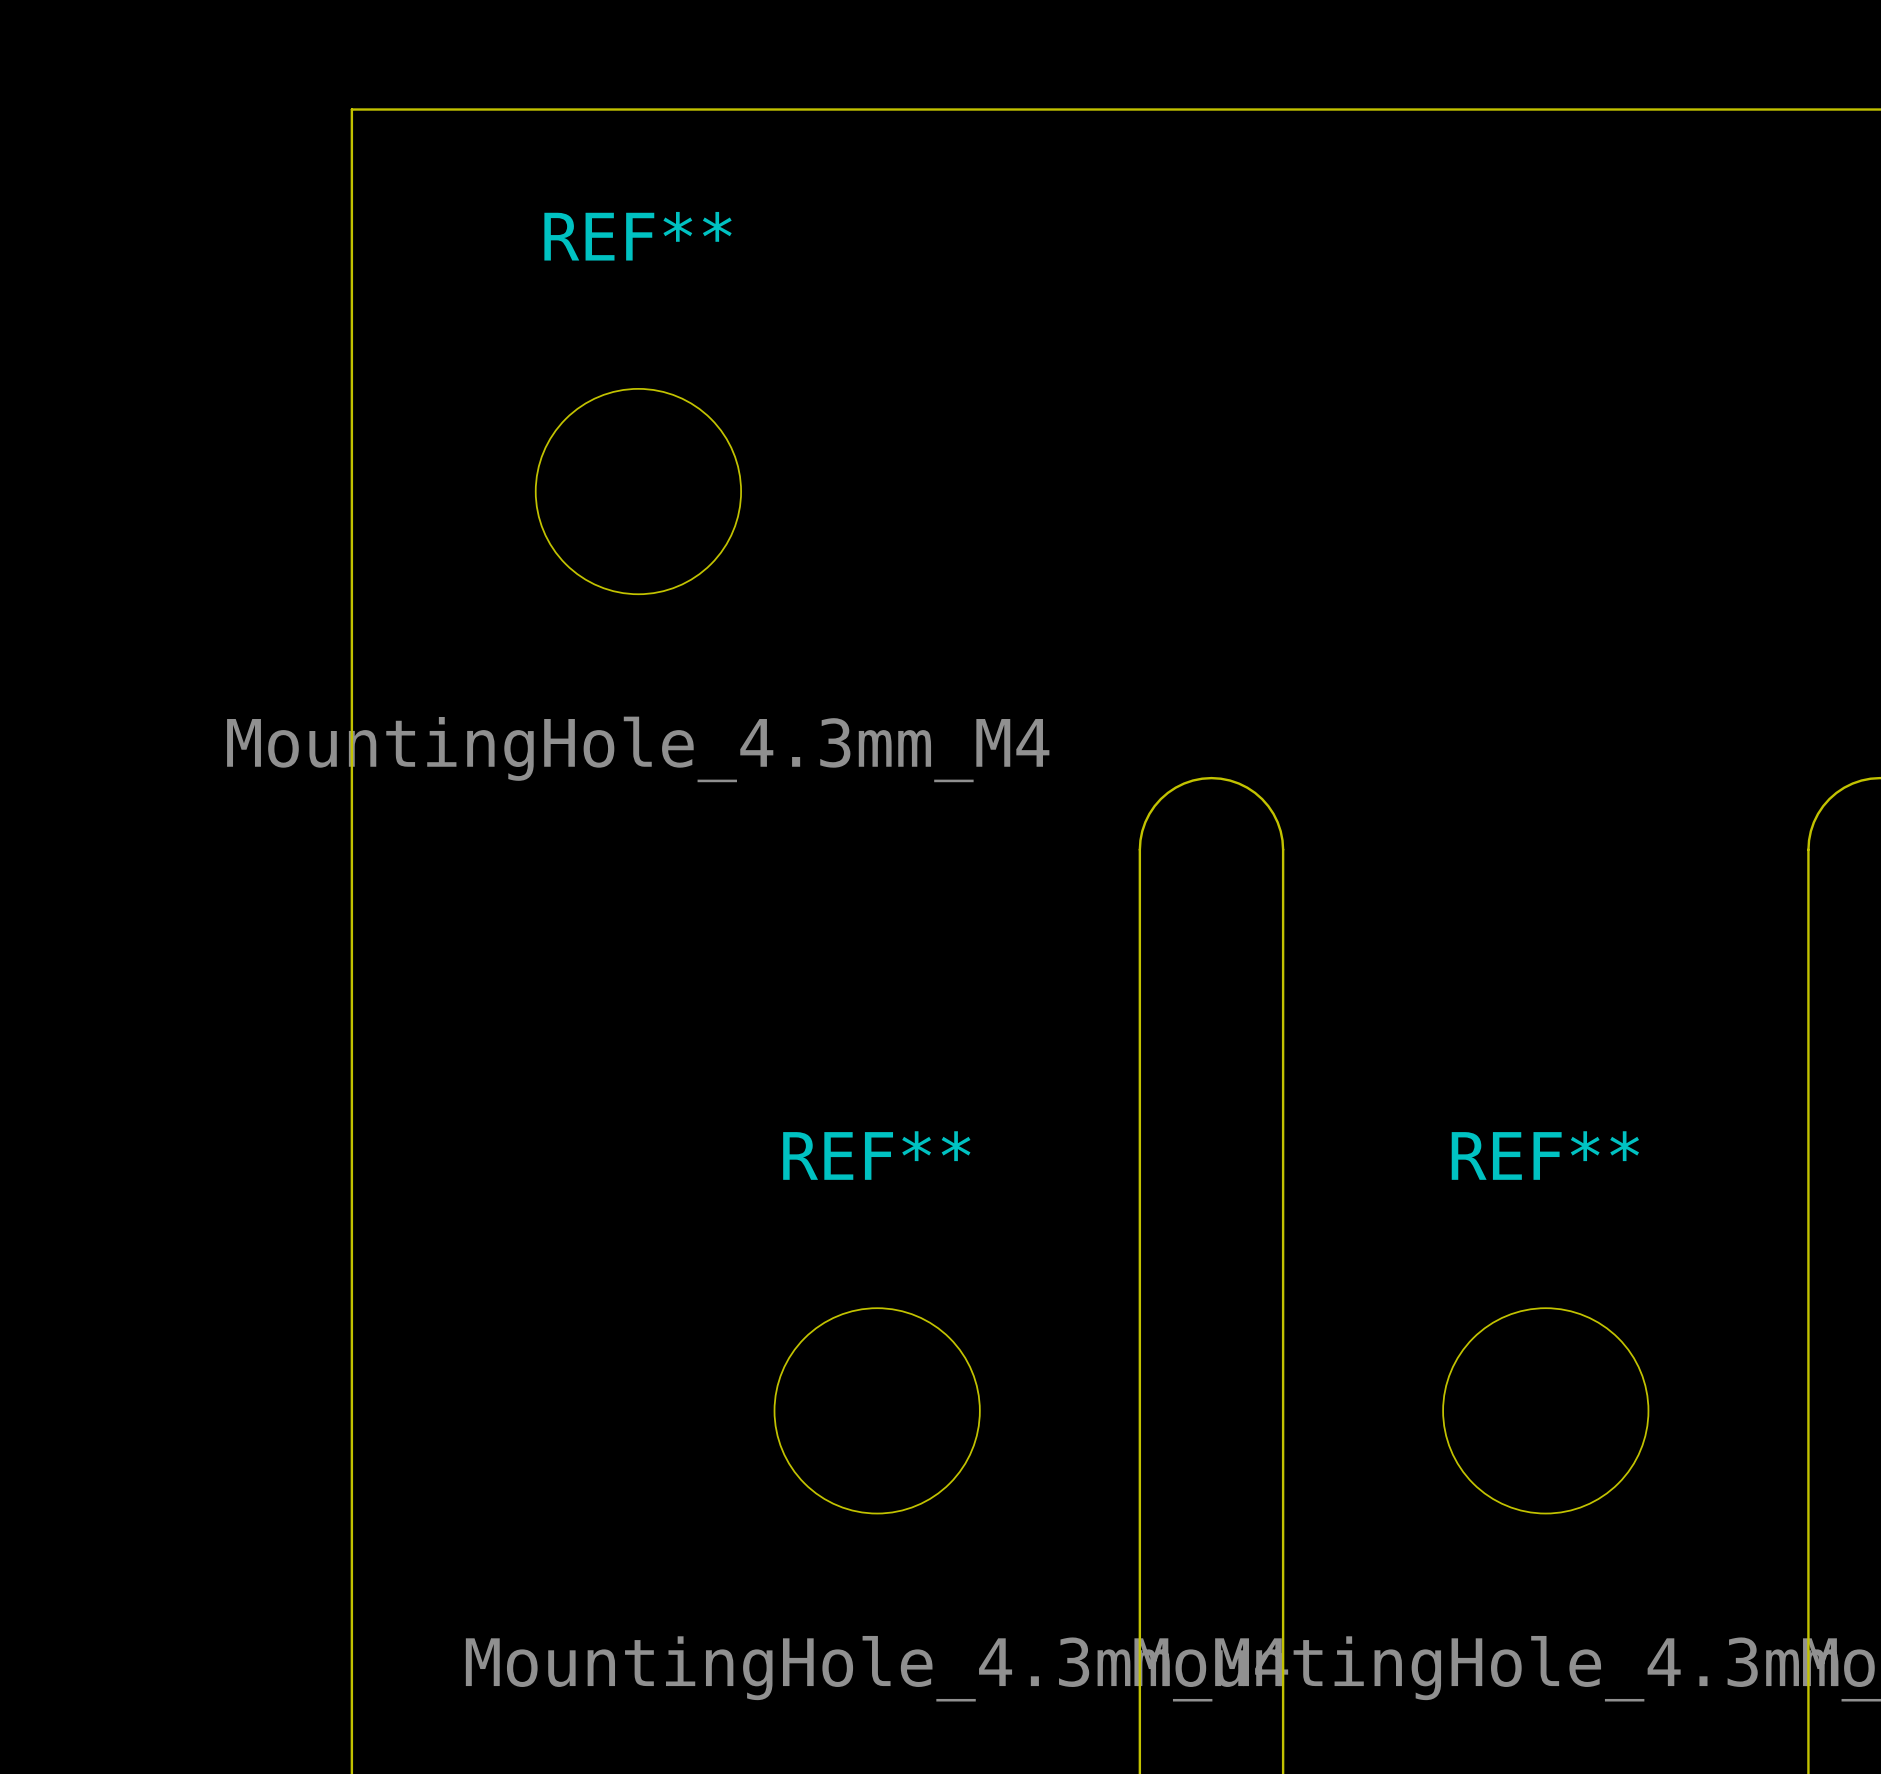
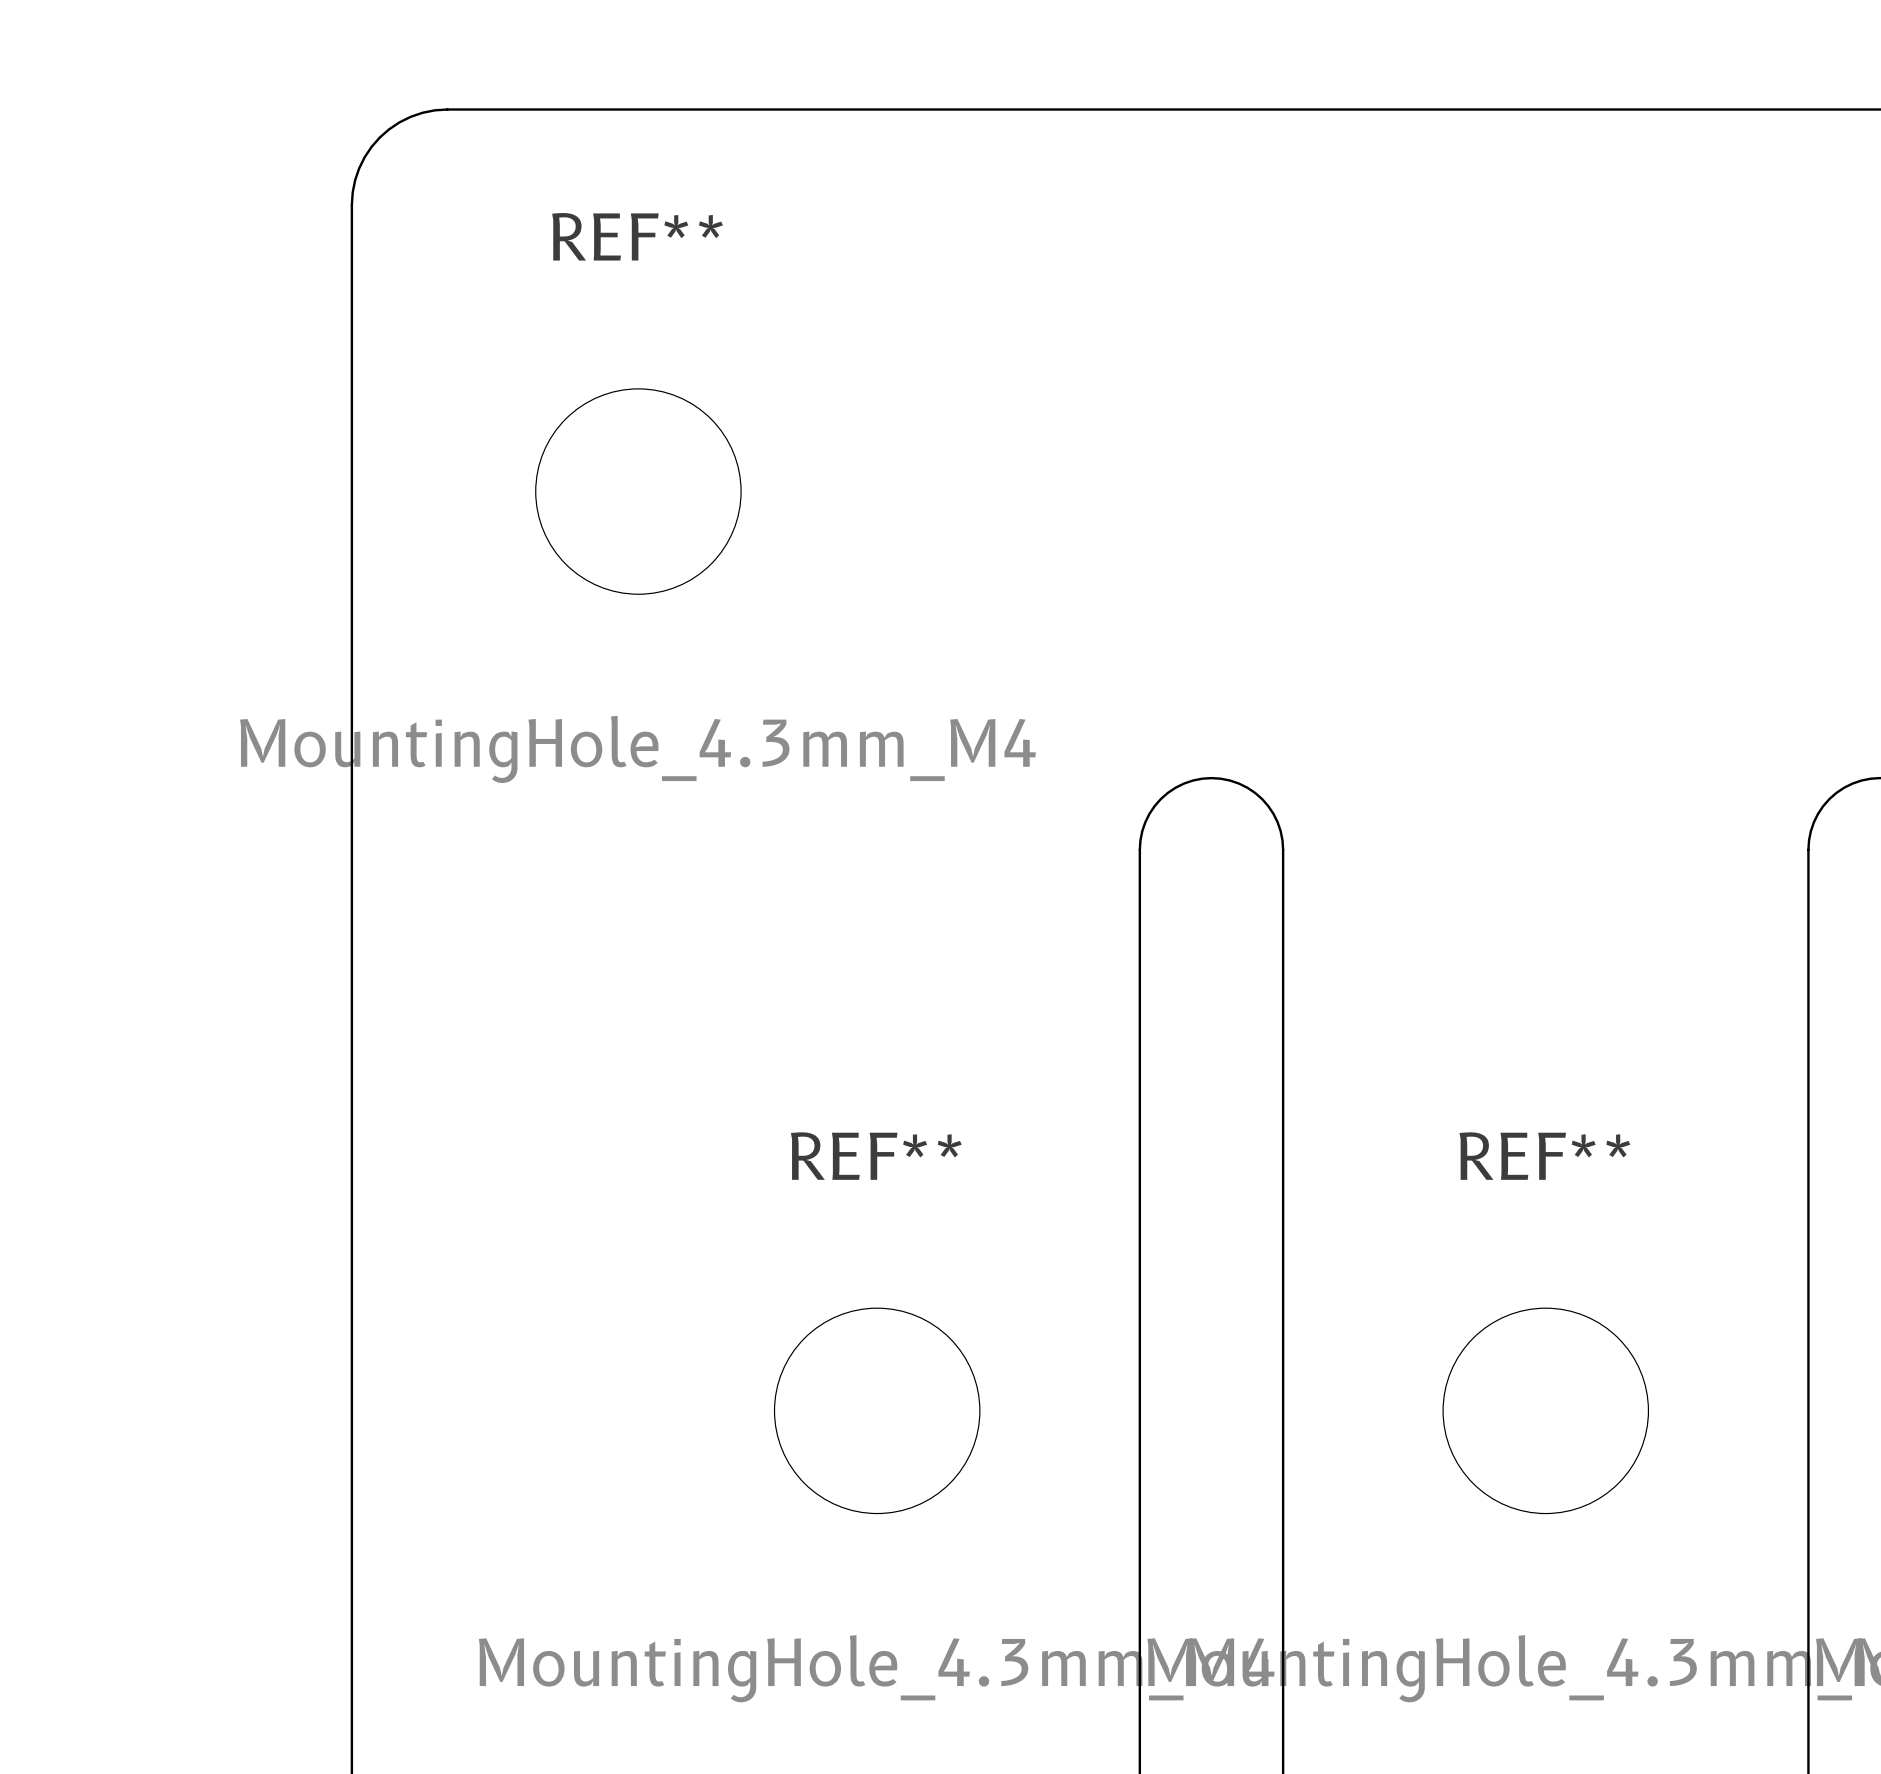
board edge: (447, 109) (351, 109) (351, 205) -> (447, 109) (422, 112) (410, 116) (389, 129) (379, 137) (371, 146) (359, 168) (355, 180) (351, 205)

